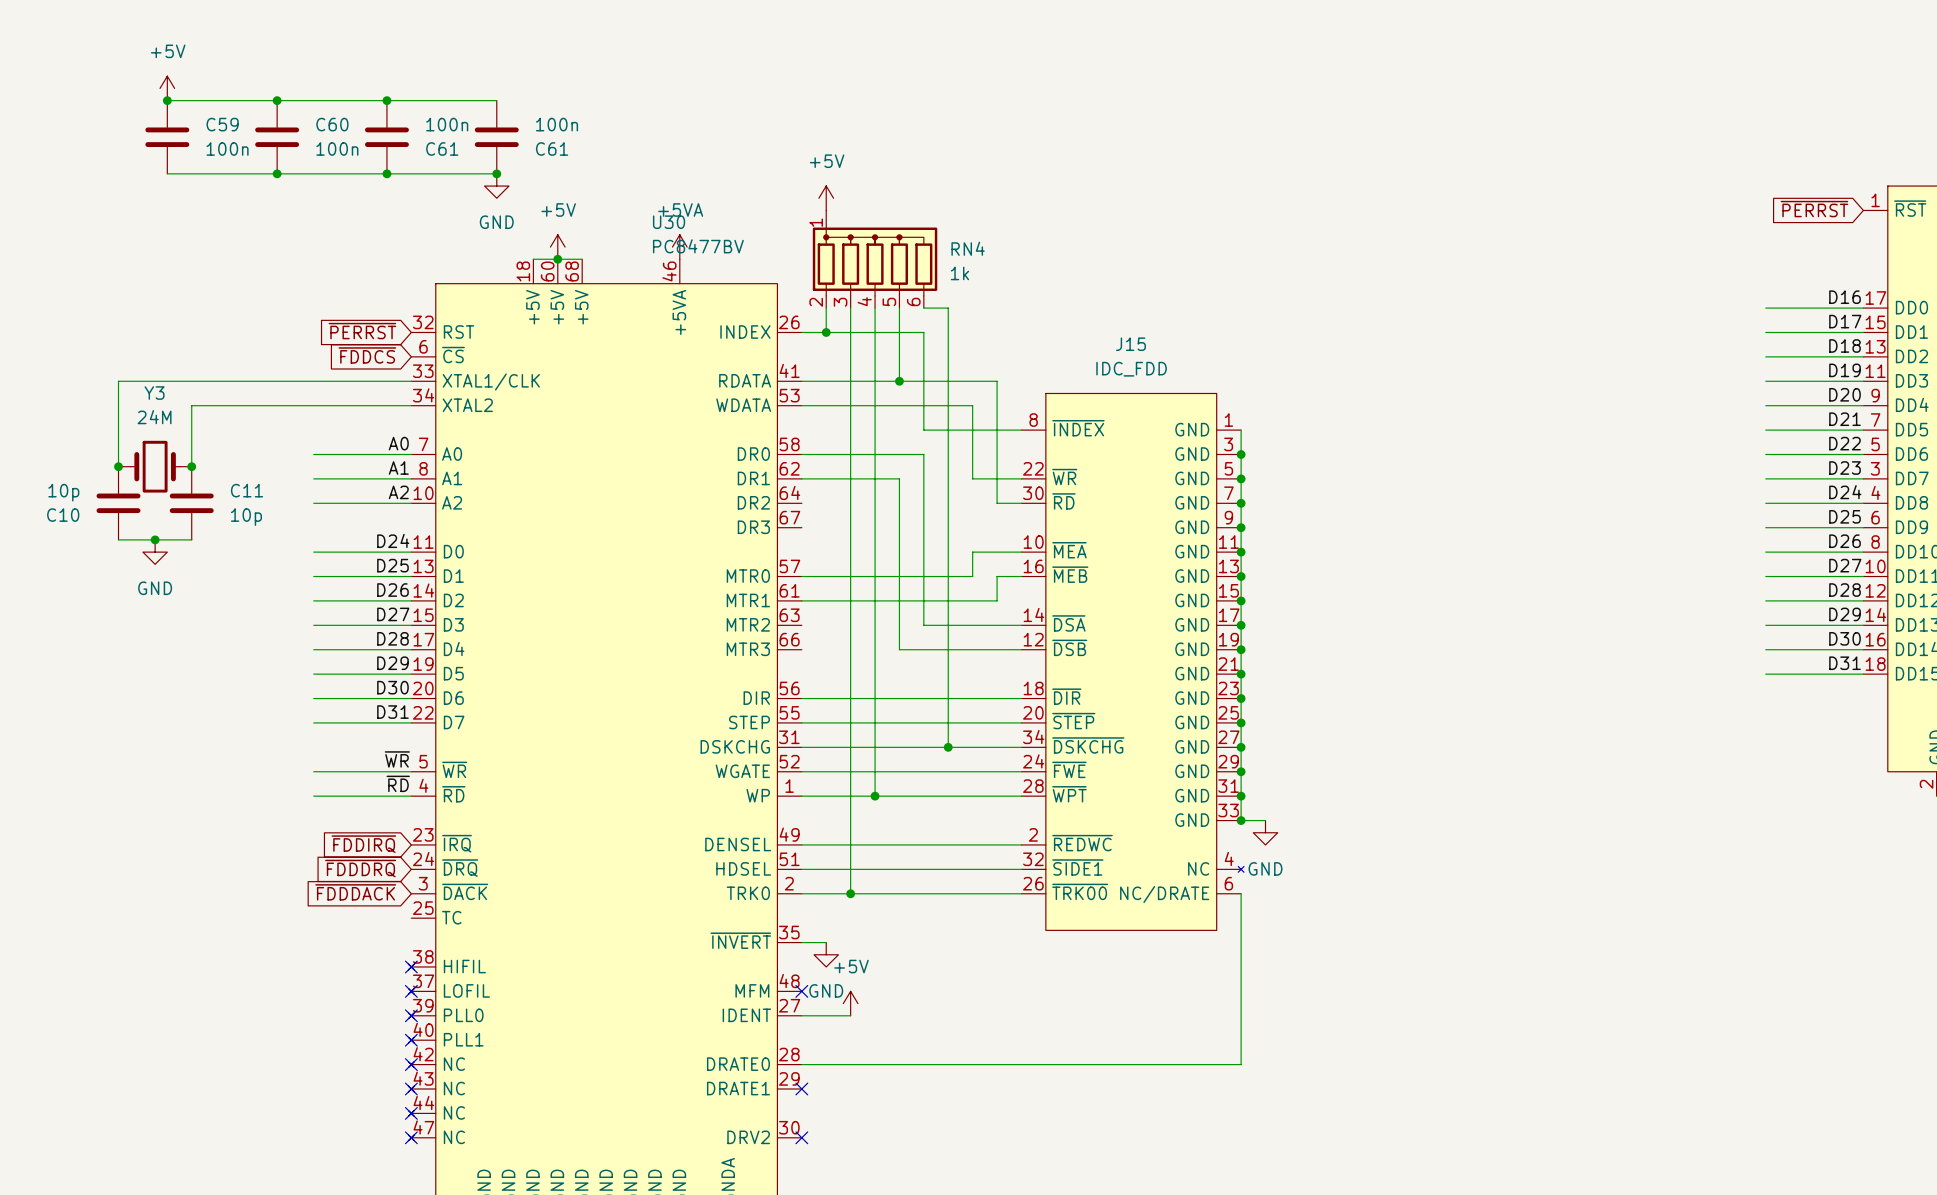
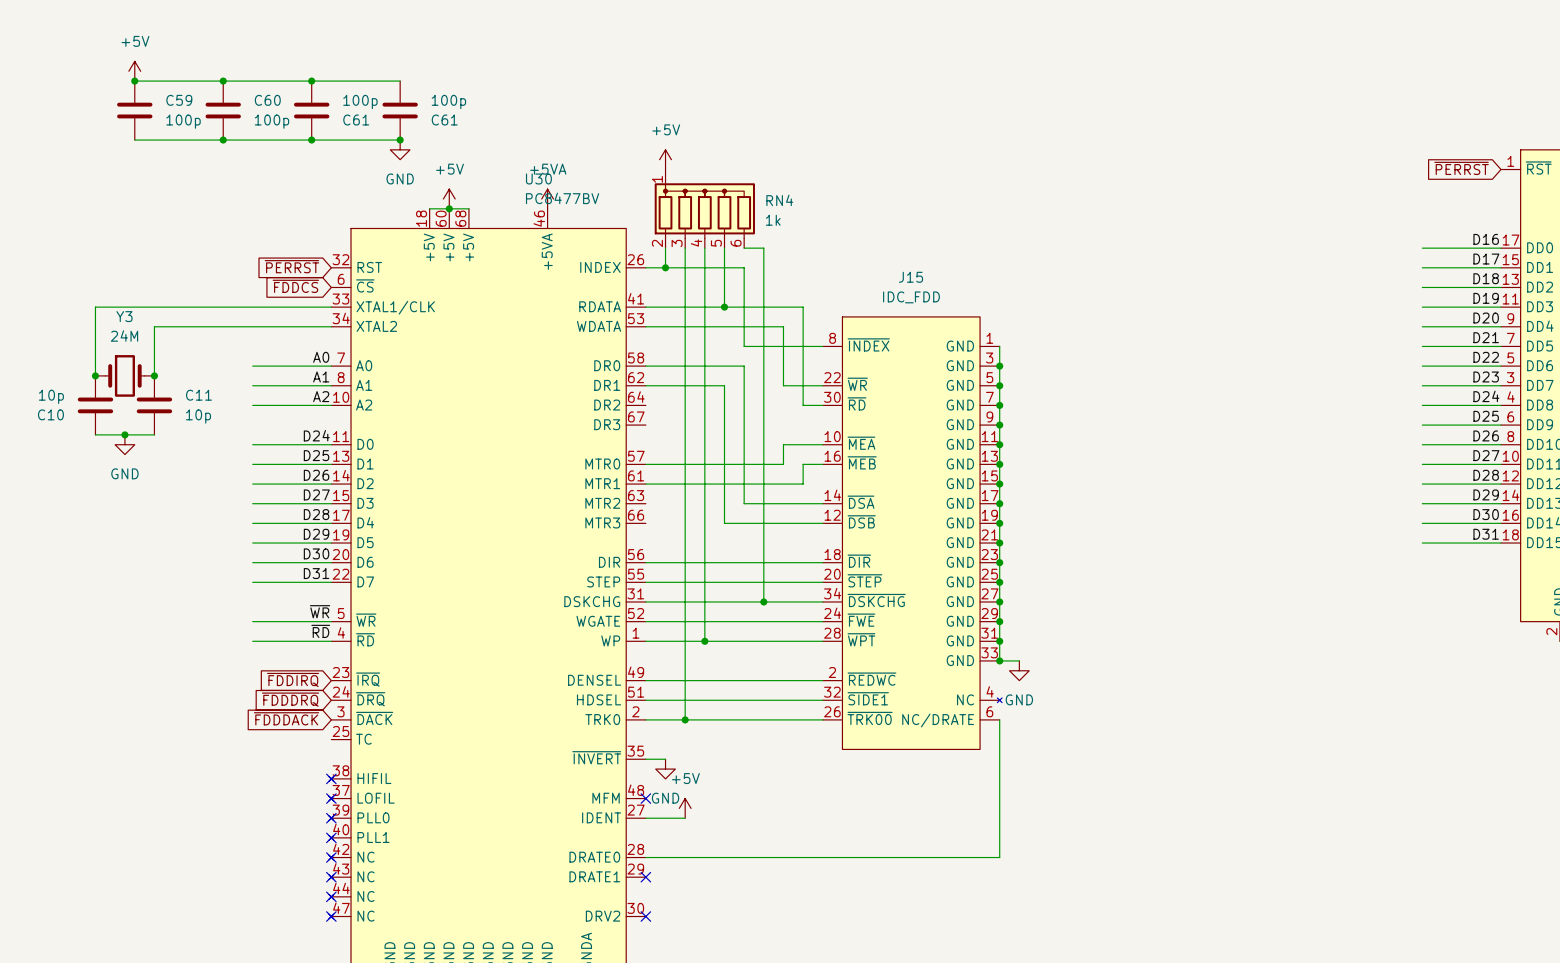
C61 value: 100n (447, 124) -> 100p (360, 101)
C61 value: 100n (557, 124) -> 100p (448, 101)
C59 value: 100n (227, 148) -> 100p (183, 121)
C60 value: 100n (337, 148) -> 100p (271, 121)

